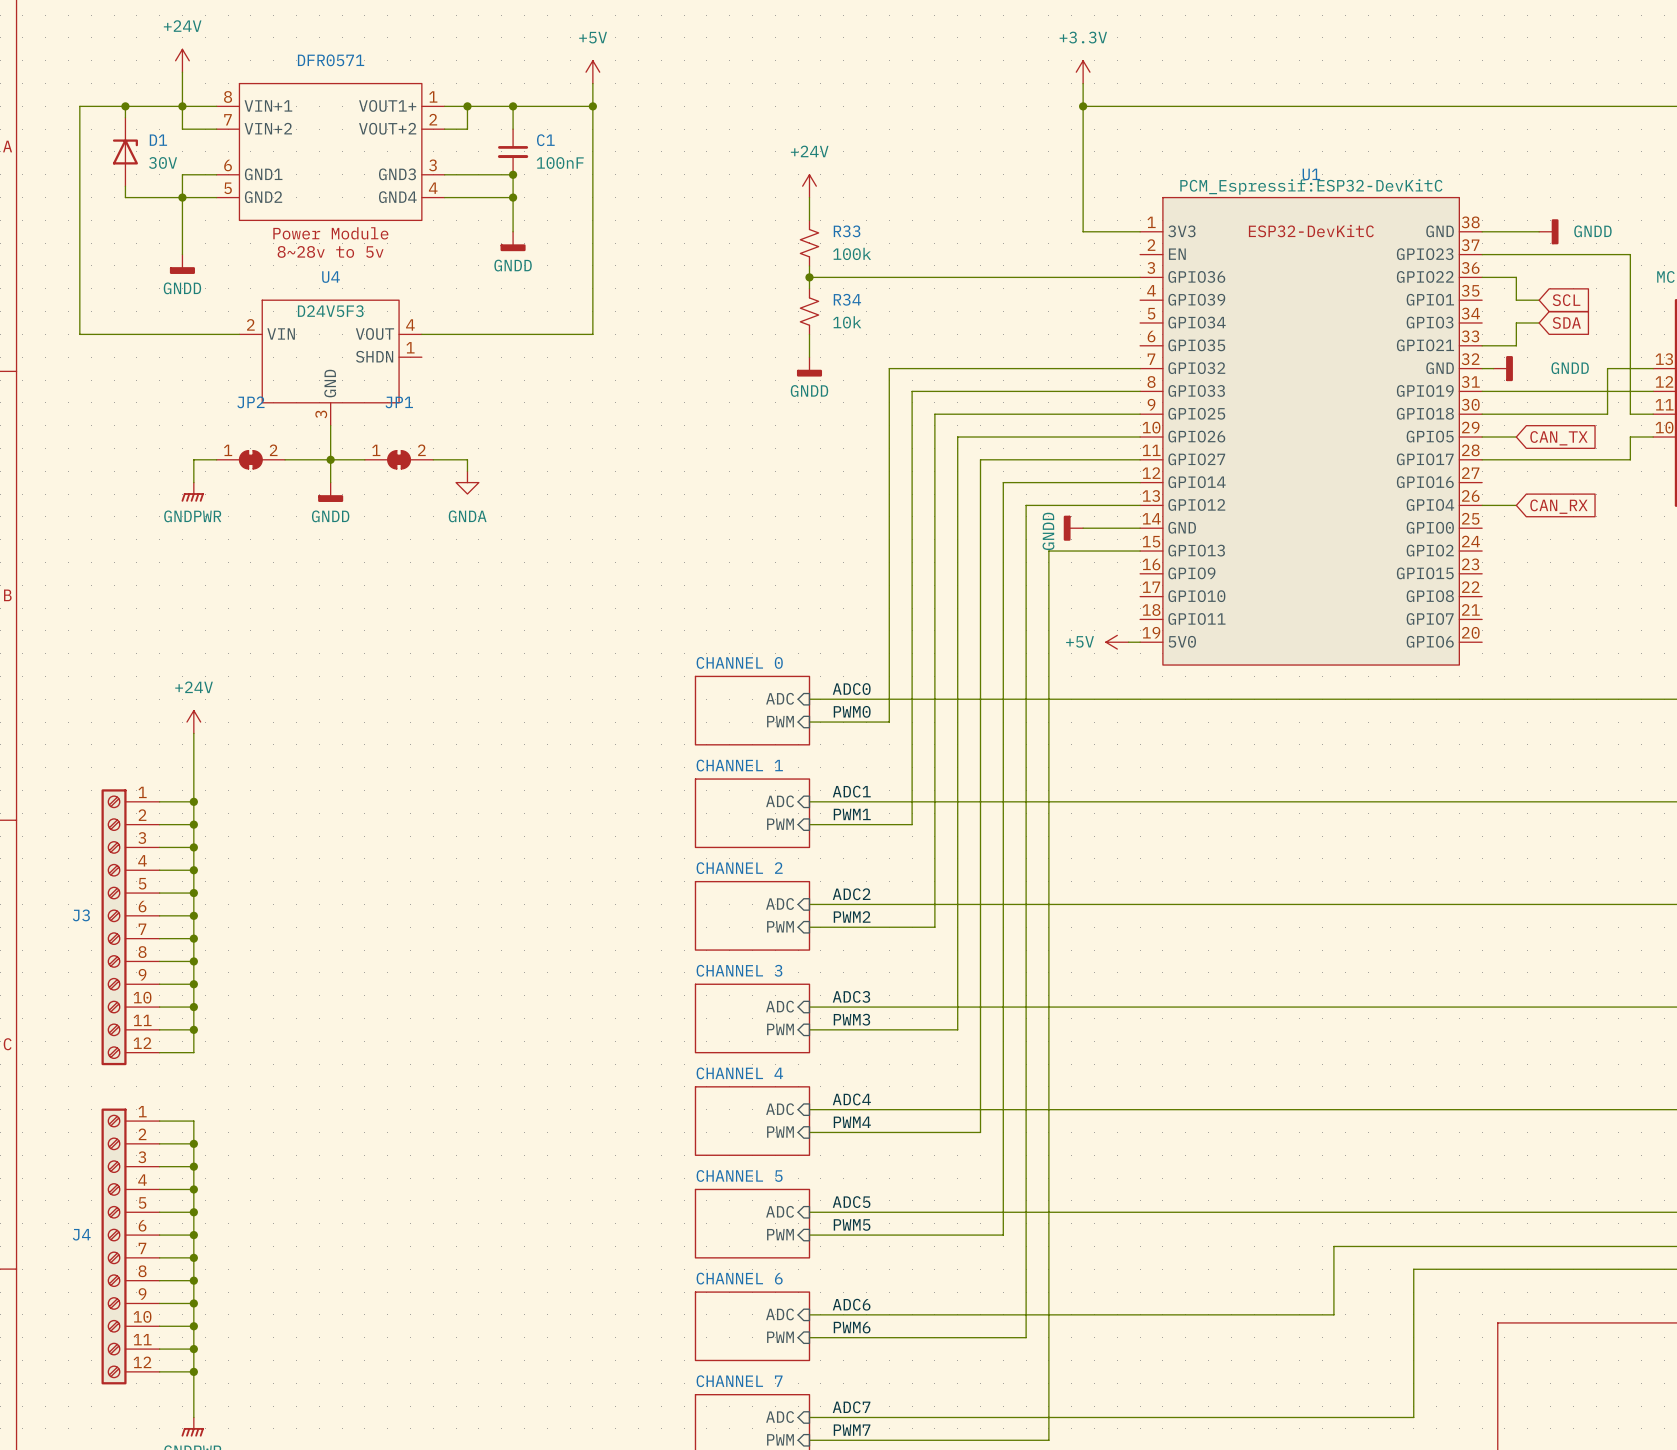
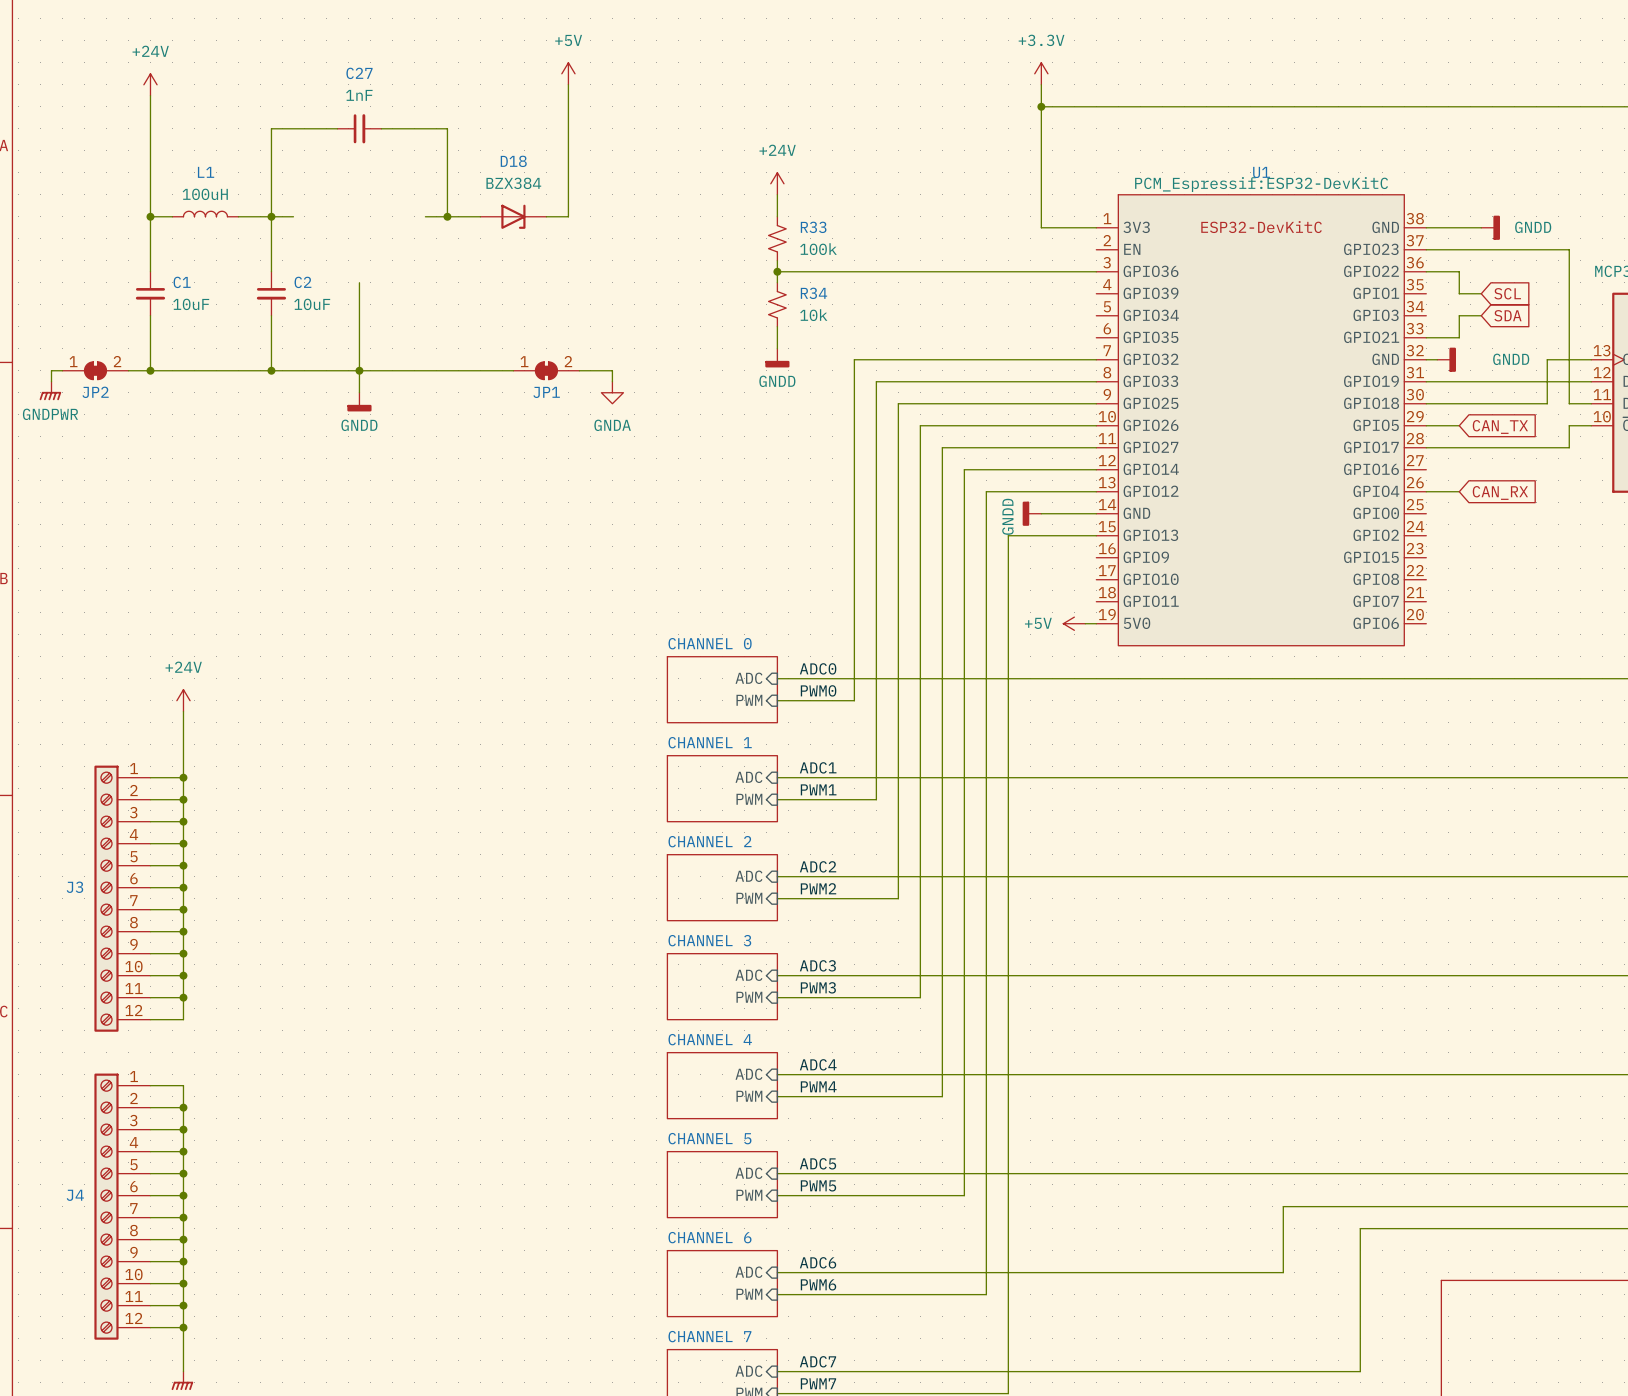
power symbol position: +24V (182, 60) -> +24V (150, 84)
wire: (182, 72) (182, 129) (216, 129) -> none
wire: none -> (150, 95) (150, 271)
wire: (125, 106) (125, 117) -> none
junction: (125, 106) -> none
junction: (182, 106) -> none
wire: (216, 106) (79, 106) (79, 334) (239, 334) -> none
wire: (444, 106) (592, 106) -> none
wire: (467, 106) (467, 129) -> (447, 216) (447, 128)
junction: (467, 106) -> none
wire: (513, 106) (513, 129) -> none
junction: (513, 106) -> none
junction: (592, 106) -> none
wire: none -> (337, 128) (271, 128) (271, 271)
C27: none -> 1nF (359, 128)
D1: 30V (125, 151) -> none
DFR0571: (330, 151) -> none
C1 position: (513, 151) -> (150, 293)
C1 value: 100nF (560, 163) -> 10uF (191, 304)
wire: (216, 174) (182, 174) (182, 254) -> none
wire: (444, 174) (513, 174) (513, 231) -> none
junction: (513, 174) -> none
wire: (125, 186) (125, 197) (216, 197) -> none
junction position: (182, 197) -> (150, 216)
wire: (444, 197) (513, 197) -> none
junction: (513, 197) -> none
L1: none -> 100uH (205, 214)
wire: none -> (150, 216) (172, 216)
junction: none -> (271, 216)
wire: none -> (425, 216) (480, 216)
junction: none -> (447, 216)
D18: none -> BZX384 (513, 216)
wire: (592, 220) (592, 334) (421, 334) -> (568, 216) (546, 216)
power symbol: GNDD (513, 241) -> none
power symbol: GNDD (182, 264) -> none
wire: none -> (359, 282) (359, 392)
C2: none -> 10uF (271, 293)
wire: none -> (150, 315) (150, 370)
U4: D24V5F3 (330, 362) -> none
wire: none -> (62, 370) (51, 370) (51, 381)
wire: none -> (128, 370) (513, 370)
junction: none -> (150, 370)
junction: none -> (271, 370)
junction: none -> (359, 370)
JP2 name position: JP2 (250, 402) -> JP2 (95, 392)
JP1 name position: JP1 (399, 402) -> JP1 (546, 392)
wire: (330, 425) (330, 482) -> (271, 315) (271, 370)
wire: (216, 459) (193, 459) (193, 482) -> none
JP2 position: (250, 459) -> (95, 370)
wire: (285, 459) (364, 459) -> none
junction: (330, 459) -> none
JP1 position: (399, 459) -> (546, 370)
wire: (433, 459) (467, 459) (467, 471) -> (579, 370) (612, 370) (612, 381)
power symbol position: GNDA (467, 482) -> GNDA (612, 392)
power symbol position: GNDPWR (192, 492) -> GNDPWR (50, 390)
power symbol position: GNDD (330, 492) -> GNDD (359, 402)

